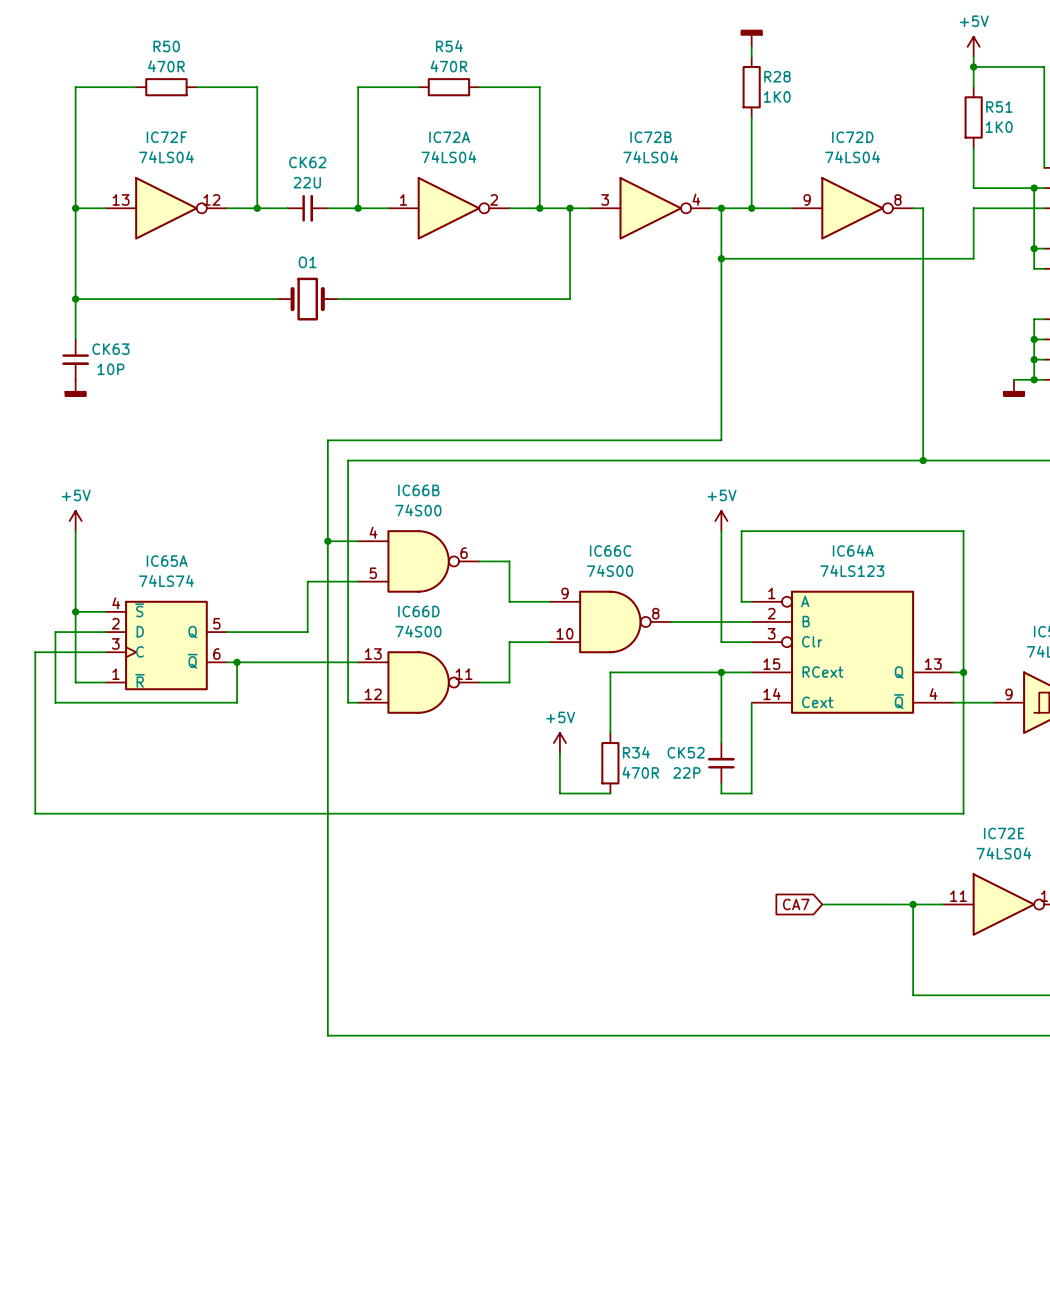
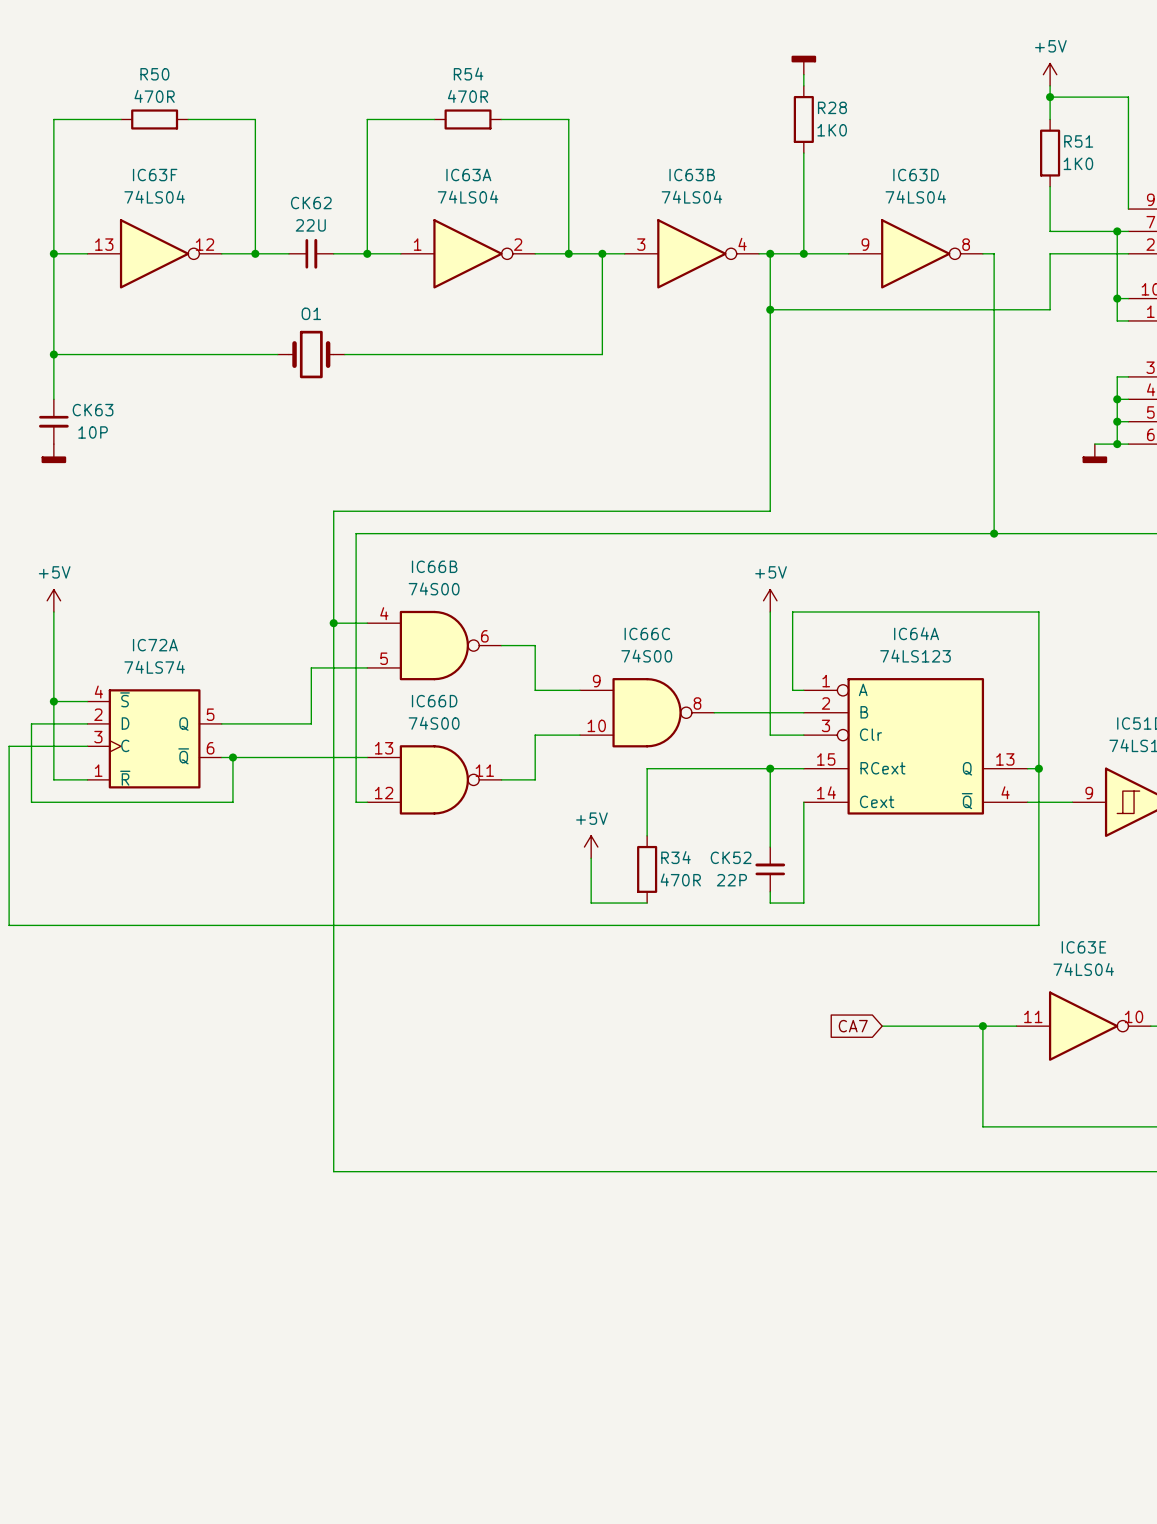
IC72F name: IC72F (166, 137) -> IC63F (155, 175)
IC72A name: IC72A (449, 137) -> IC63A (468, 175)
IC72B name: IC72B (651, 137) -> IC63B (692, 175)
IC72D name: IC72D (852, 137) -> IC63D (916, 175)
IC65A name: IC65A (167, 561) -> IC72A (155, 645)
IC72E name: IC72E (1004, 833) -> IC63E (1083, 947)

